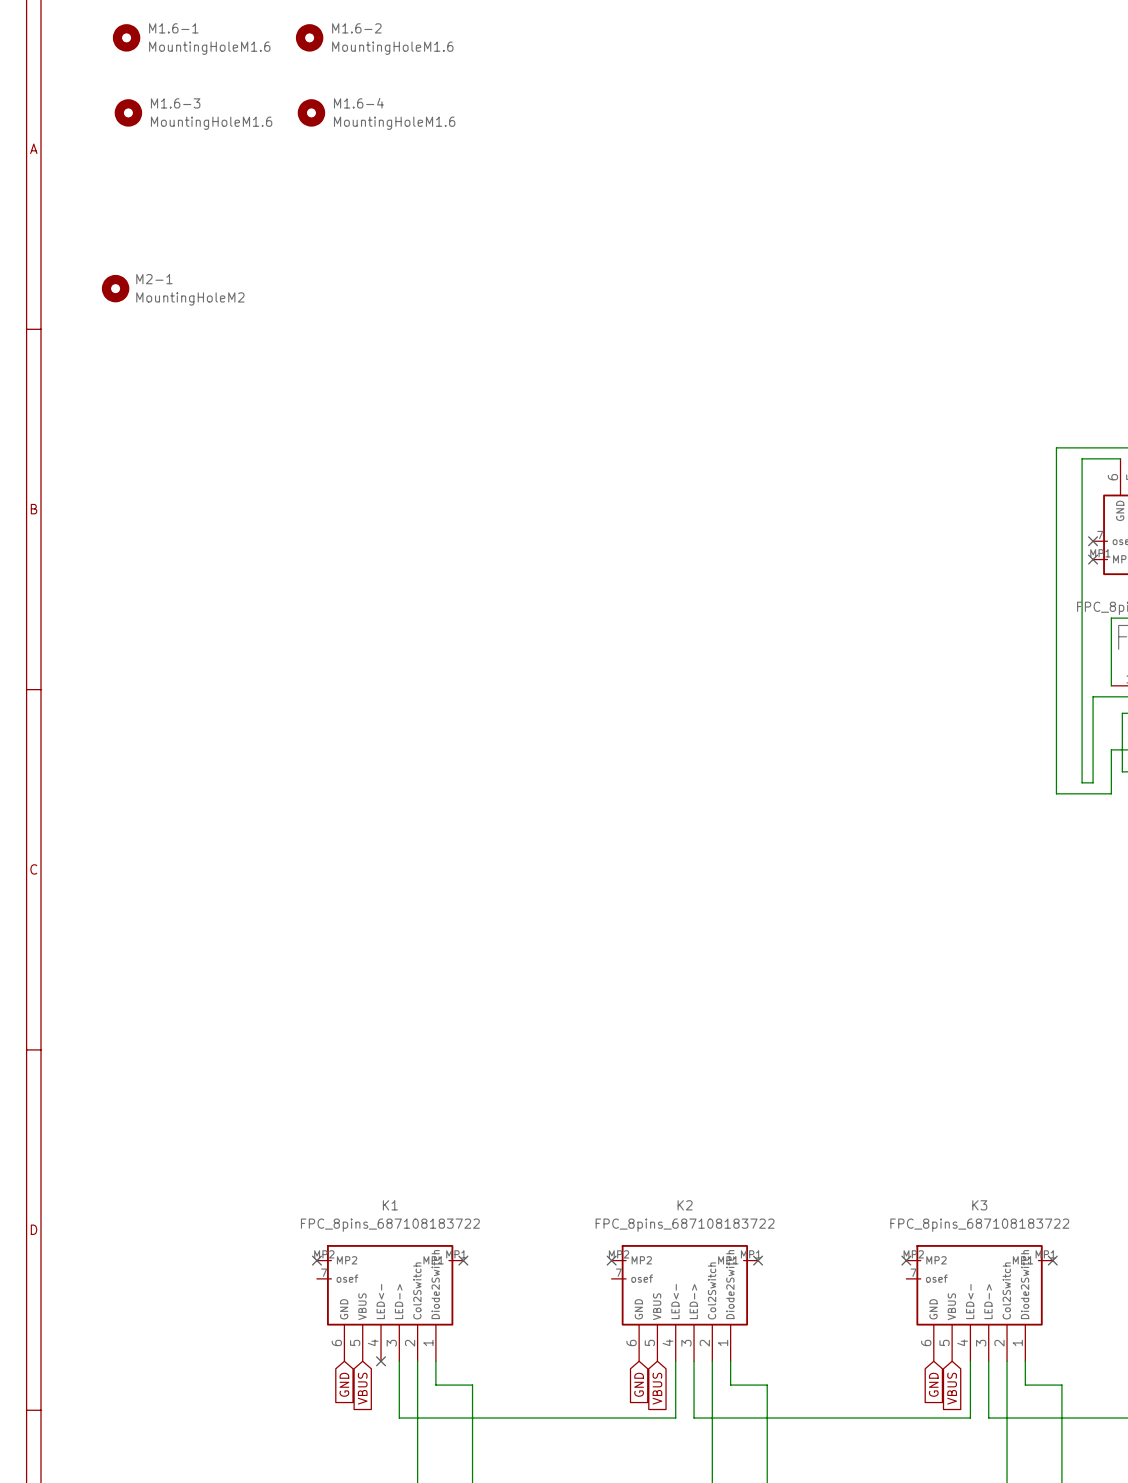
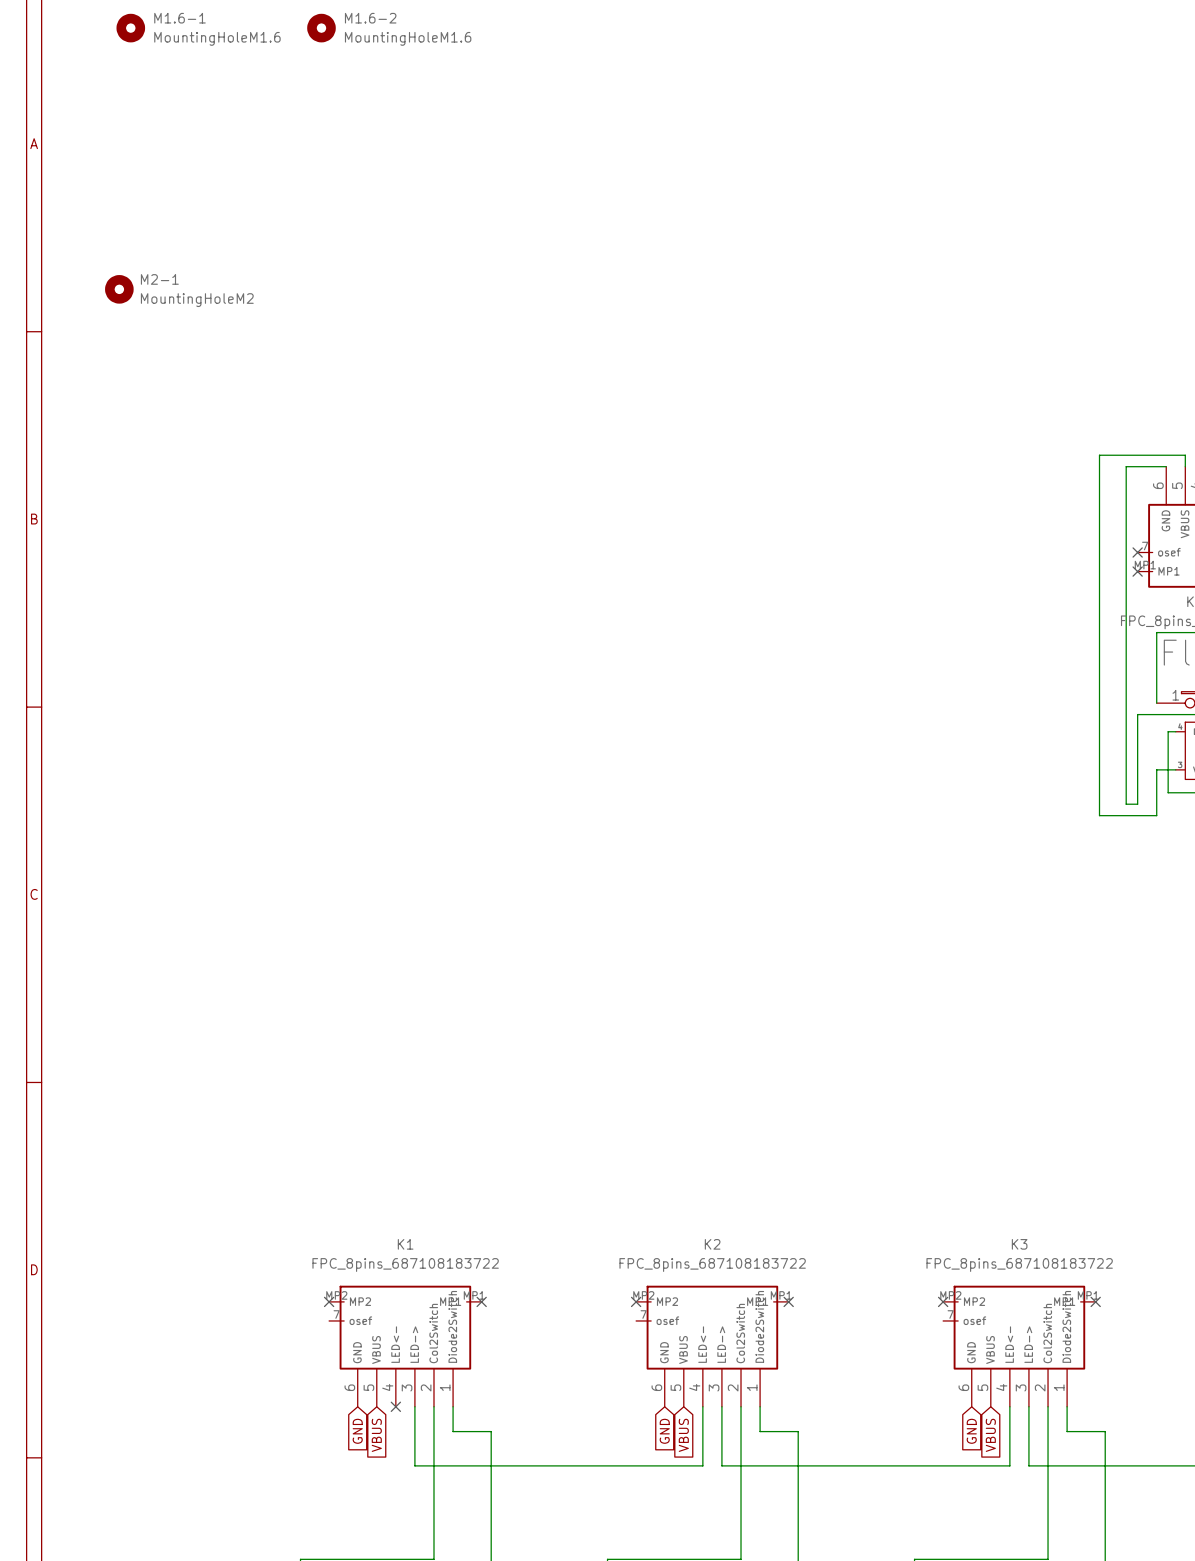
M1.6-3: MountingHoleM1.6 (128, 112) -> none
M1.6-4: MountingHoleM1.6 (311, 112) -> none

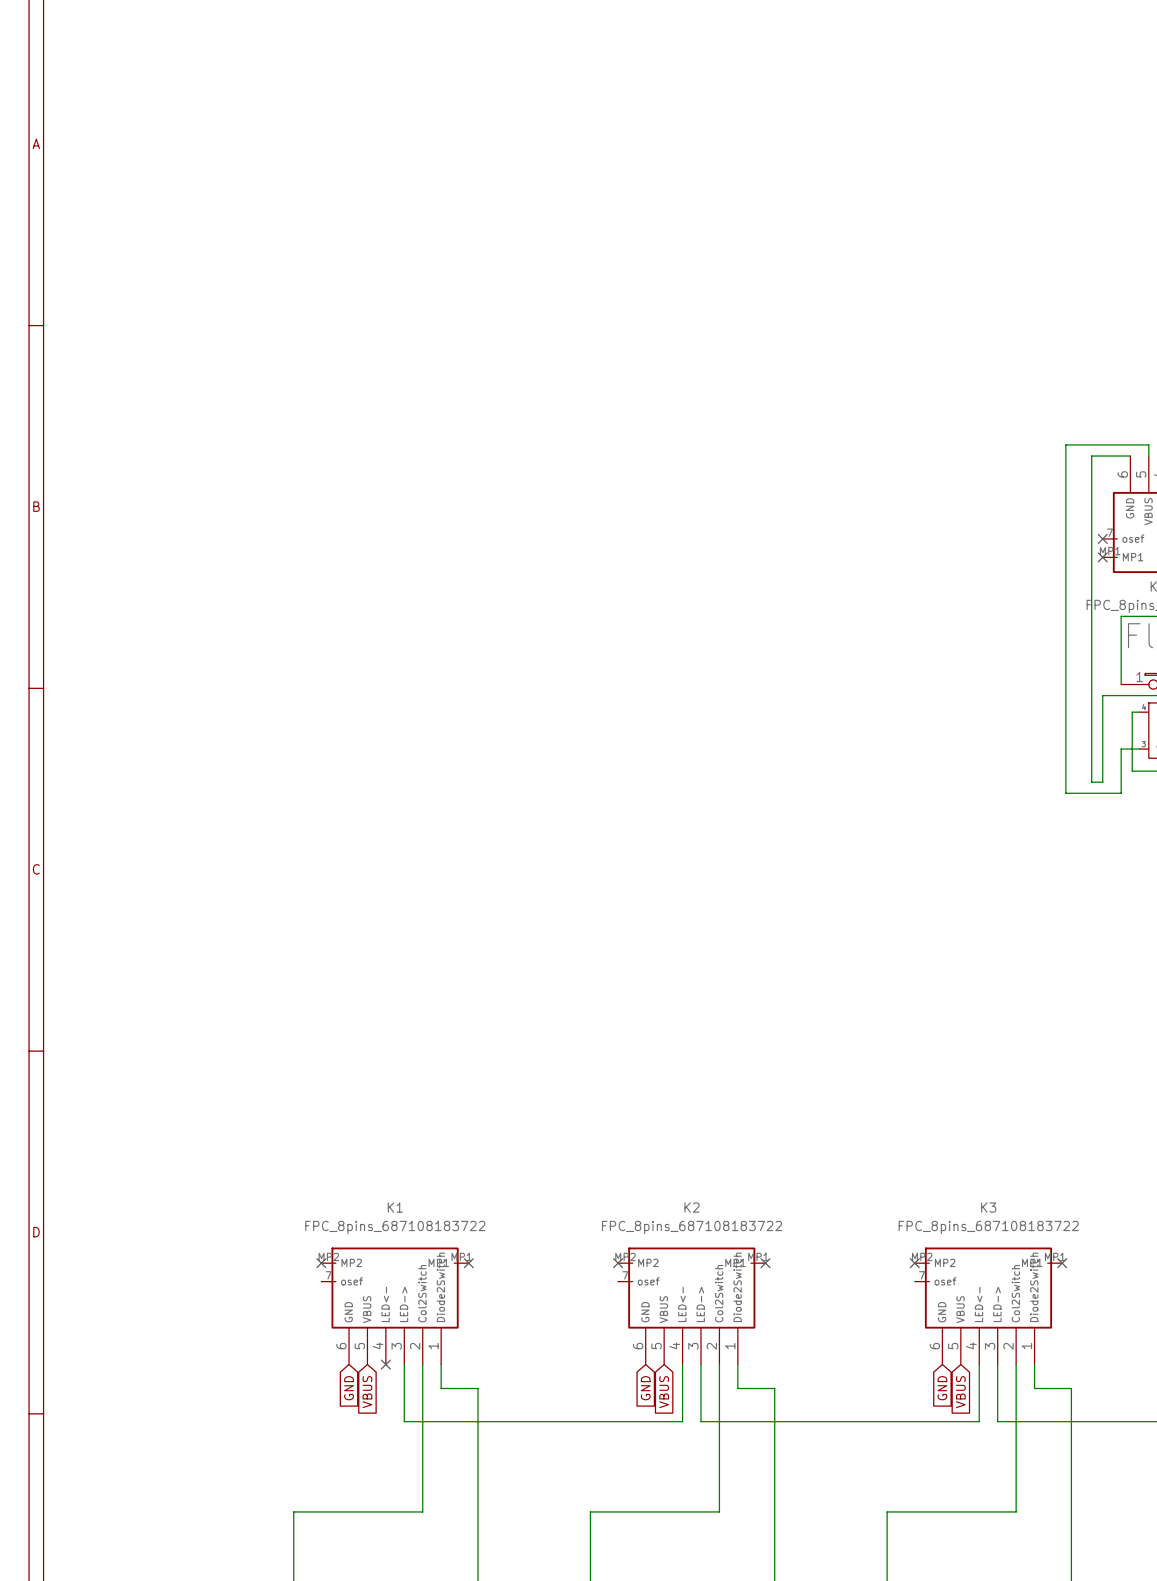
M1.6-1: MountingHoleM1.6 (130, 28) -> none
M1.6-2: MountingHoleM1.6 (321, 28) -> none
M2-1: MountingHoleM2 (119, 289) -> none

